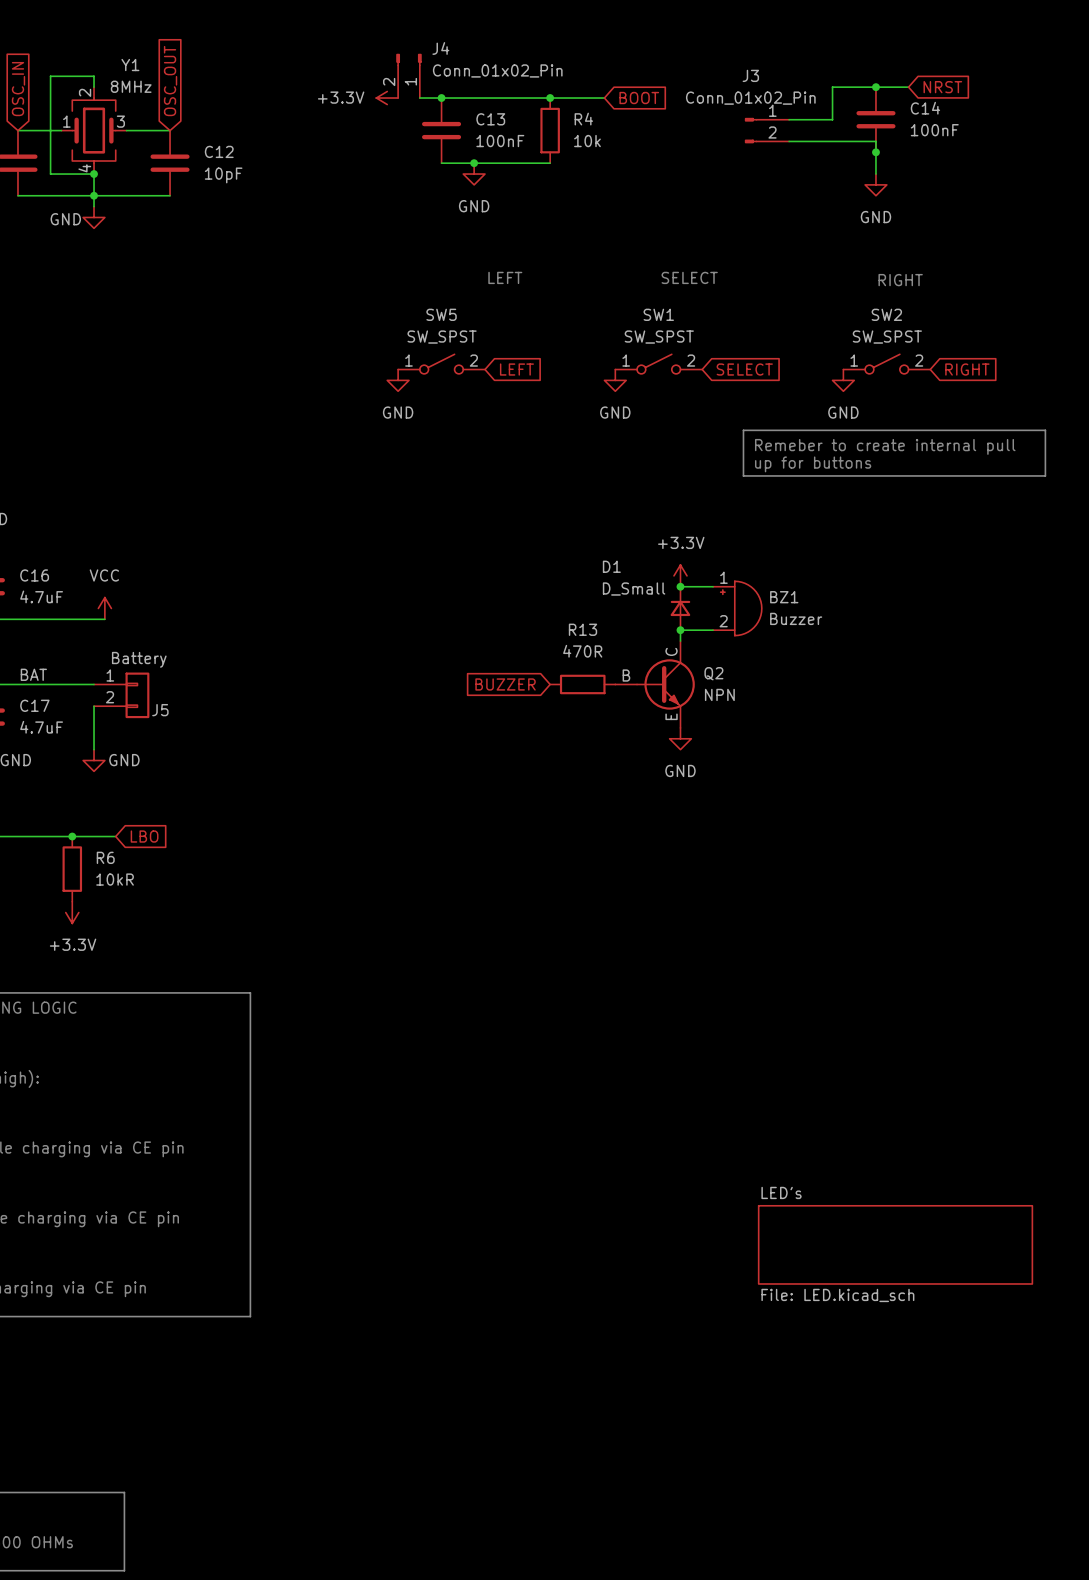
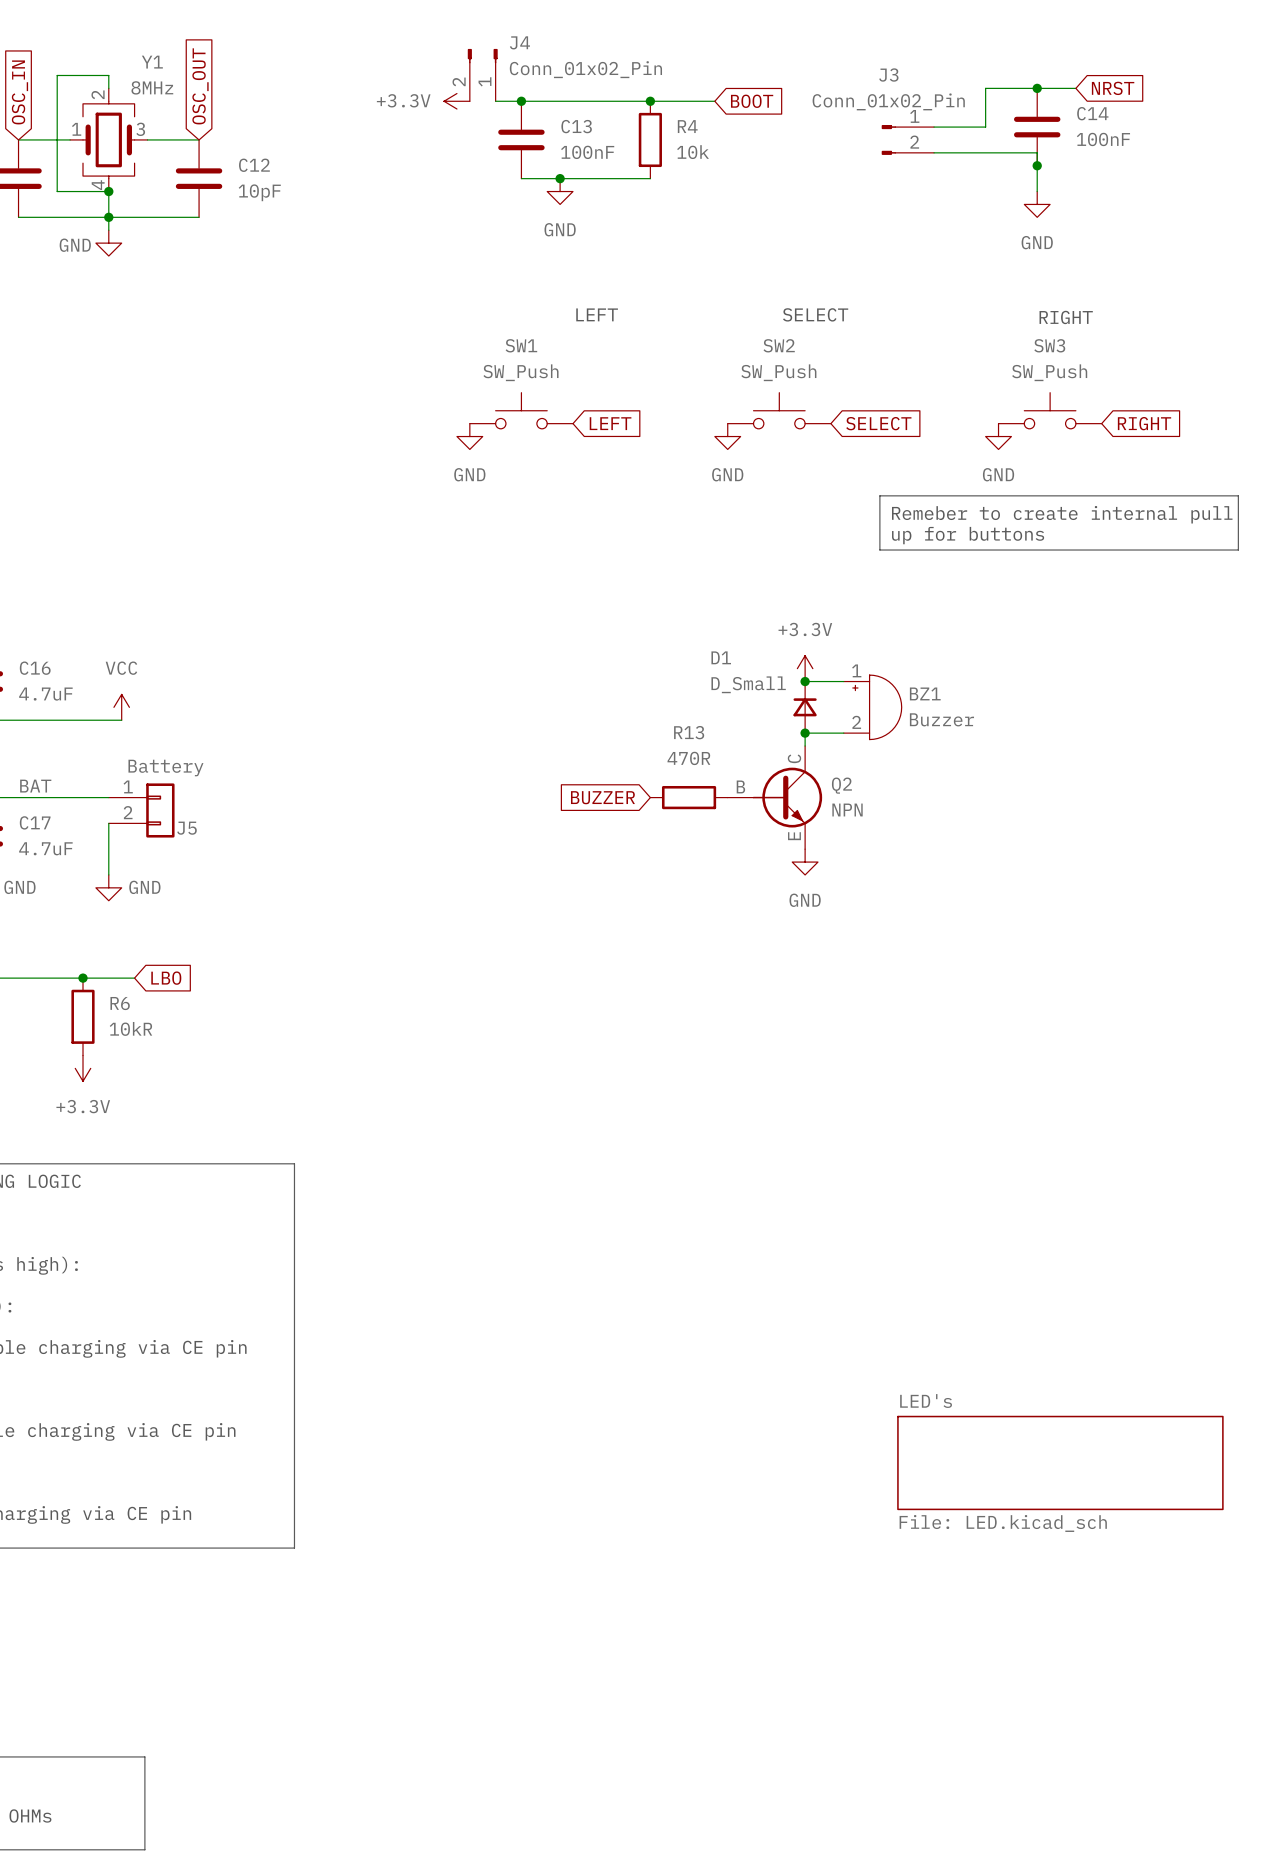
SW1 value: SW_SPST (659, 337) -> SW_Push (520, 372)
SW2 value: SW_SPST (887, 337) -> SW_Push (778, 372)
SW1 symbol: [615, 354, 703, 374] -> [469, 392, 574, 429]
SW2 symbol: [843, 354, 931, 374] -> [727, 392, 831, 429]
SW3: none -> SW_Push (1050, 410)
SW5: SW_SPST (441, 364) -> none

